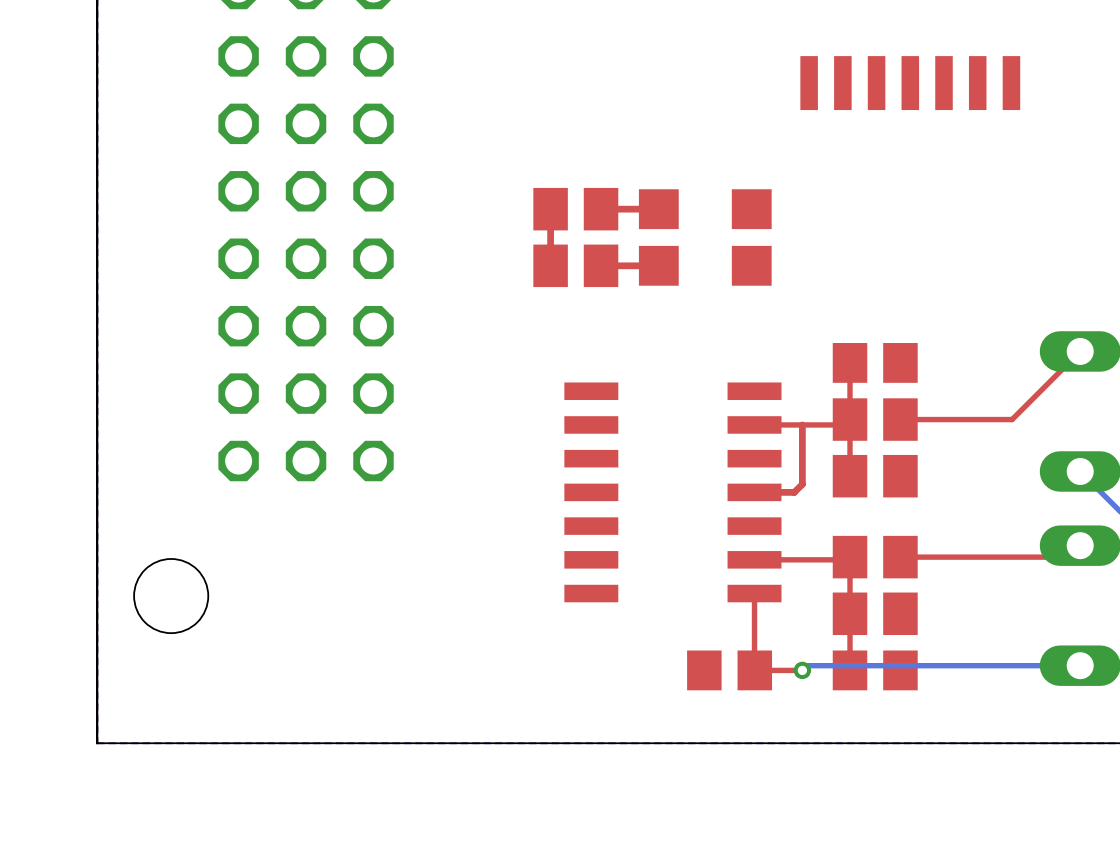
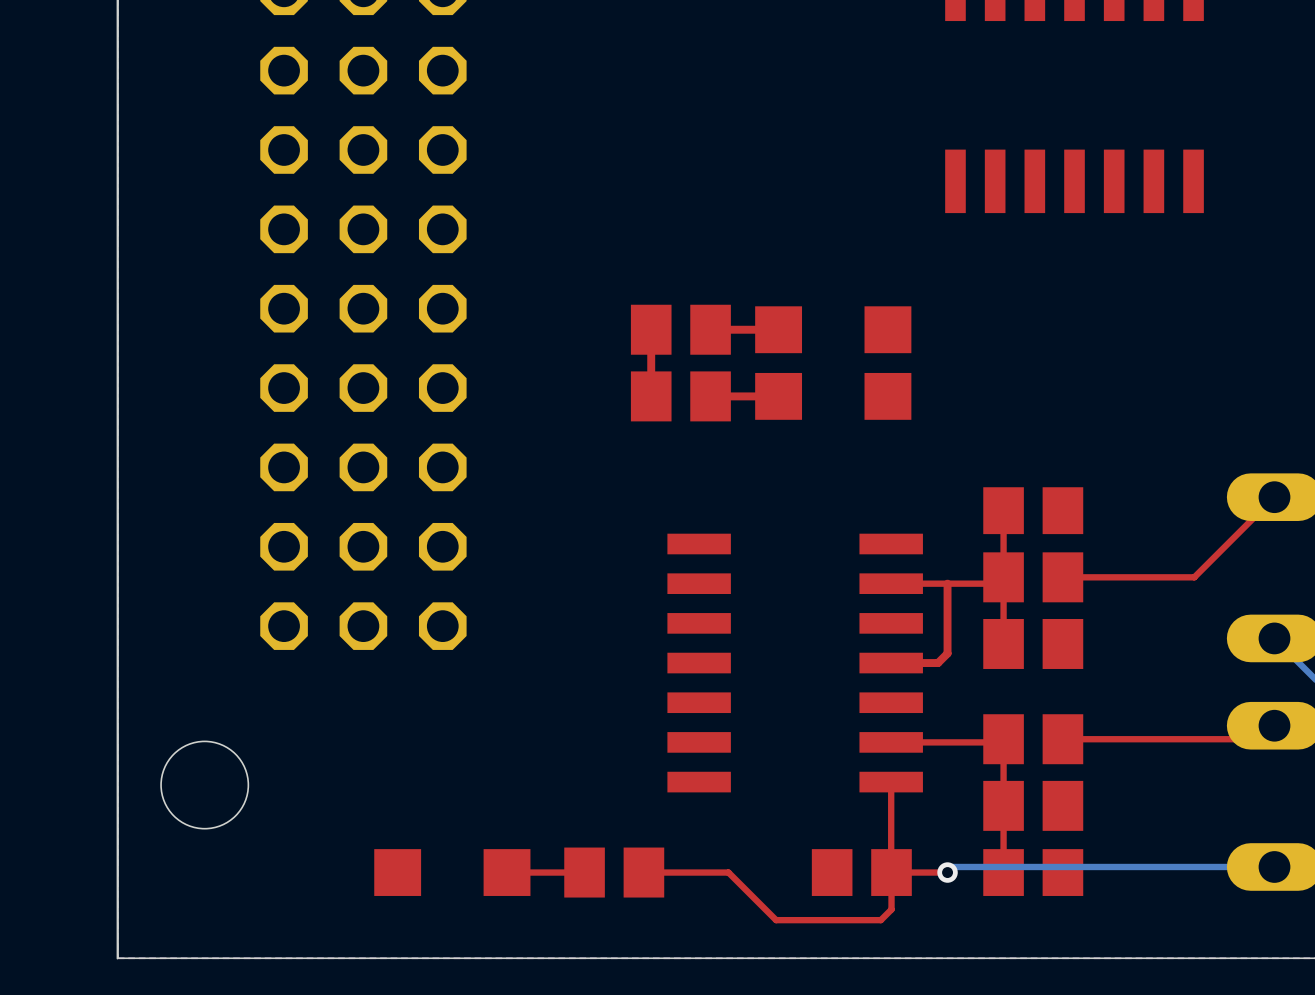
part: none -> (452, 872)
top track: none -> (584, 872) (507, 872)
part: none -> (614, 872)
top track: none -> (891, 872) (891, 909) (880, 920) (776, 920) (728, 872) (643, 872)

